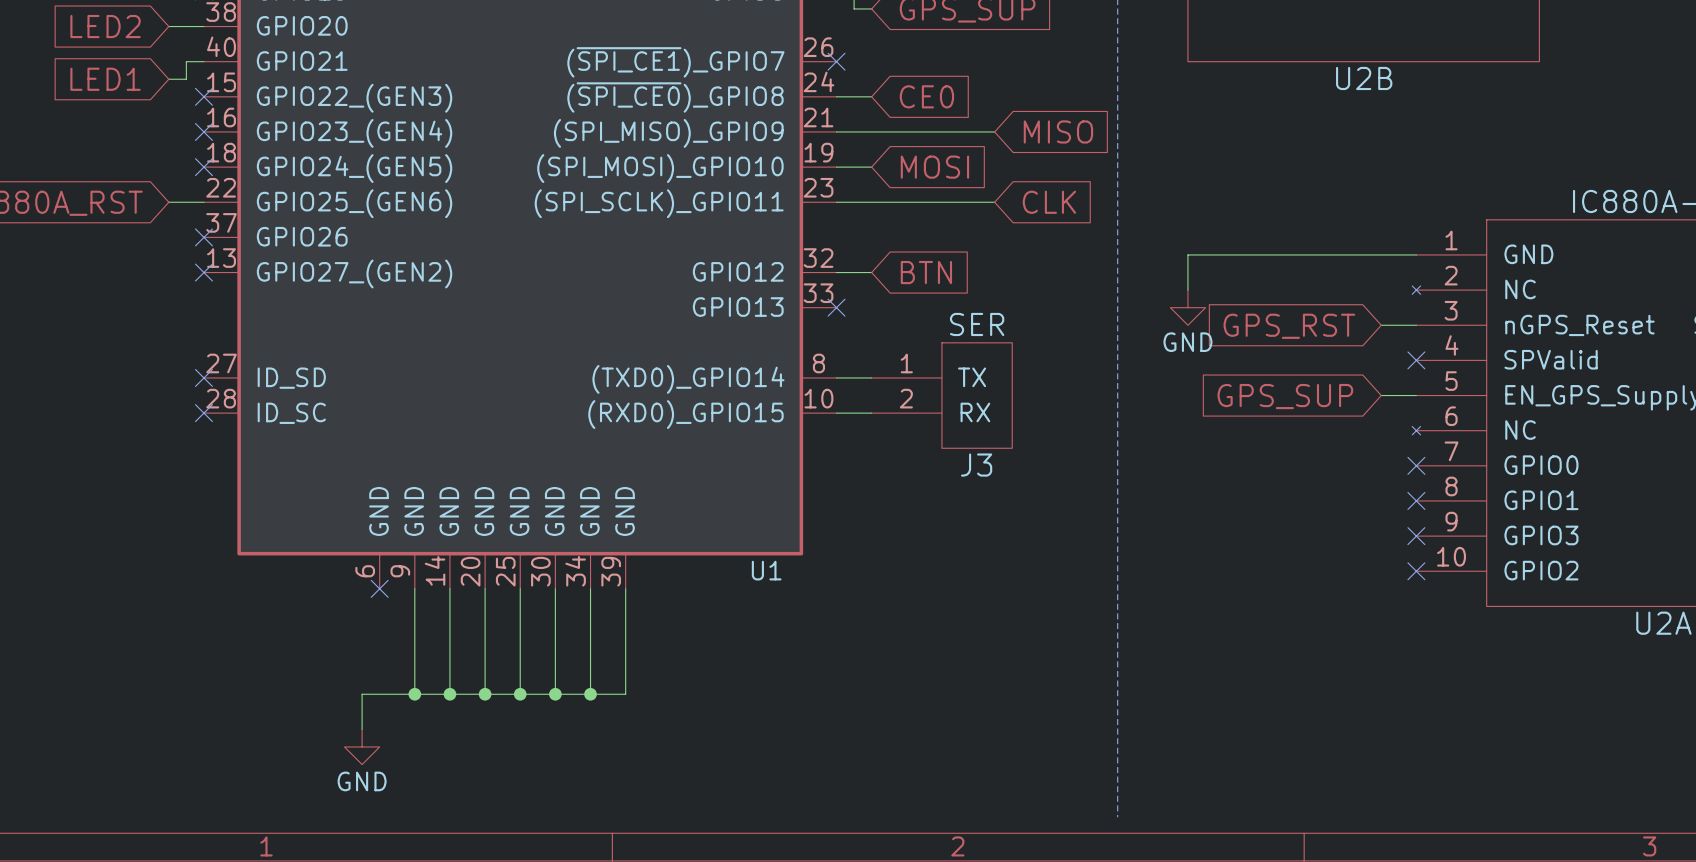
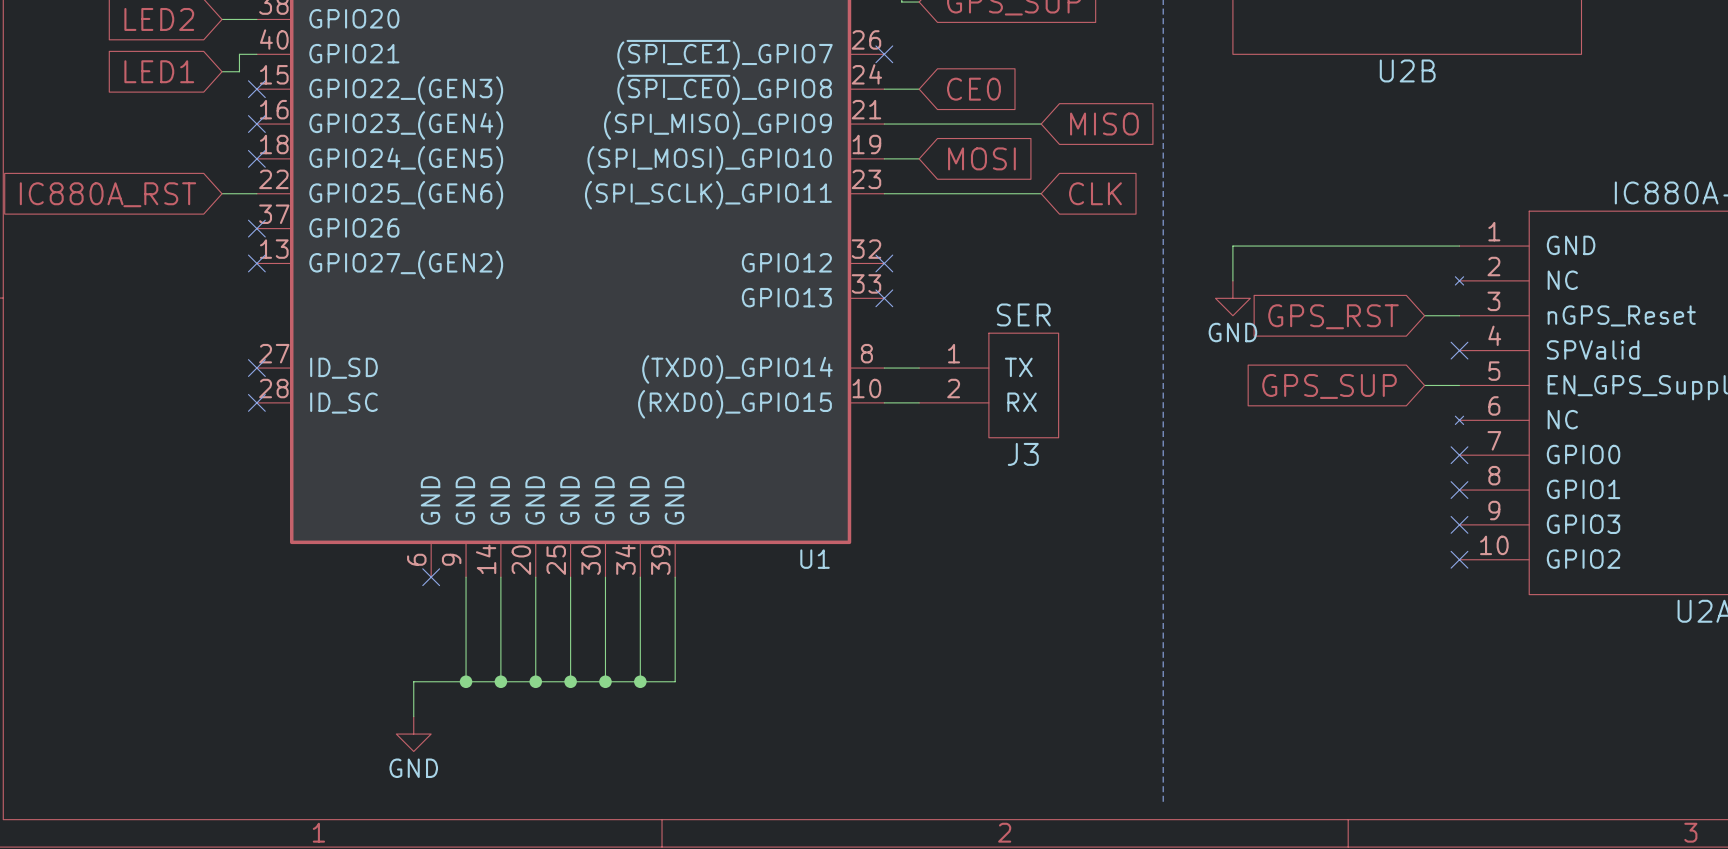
wire: (836, 272) (871, 272) -> none
no-connect mark: none -> (884, 263)
global label: BTN (926, 272) -> none

